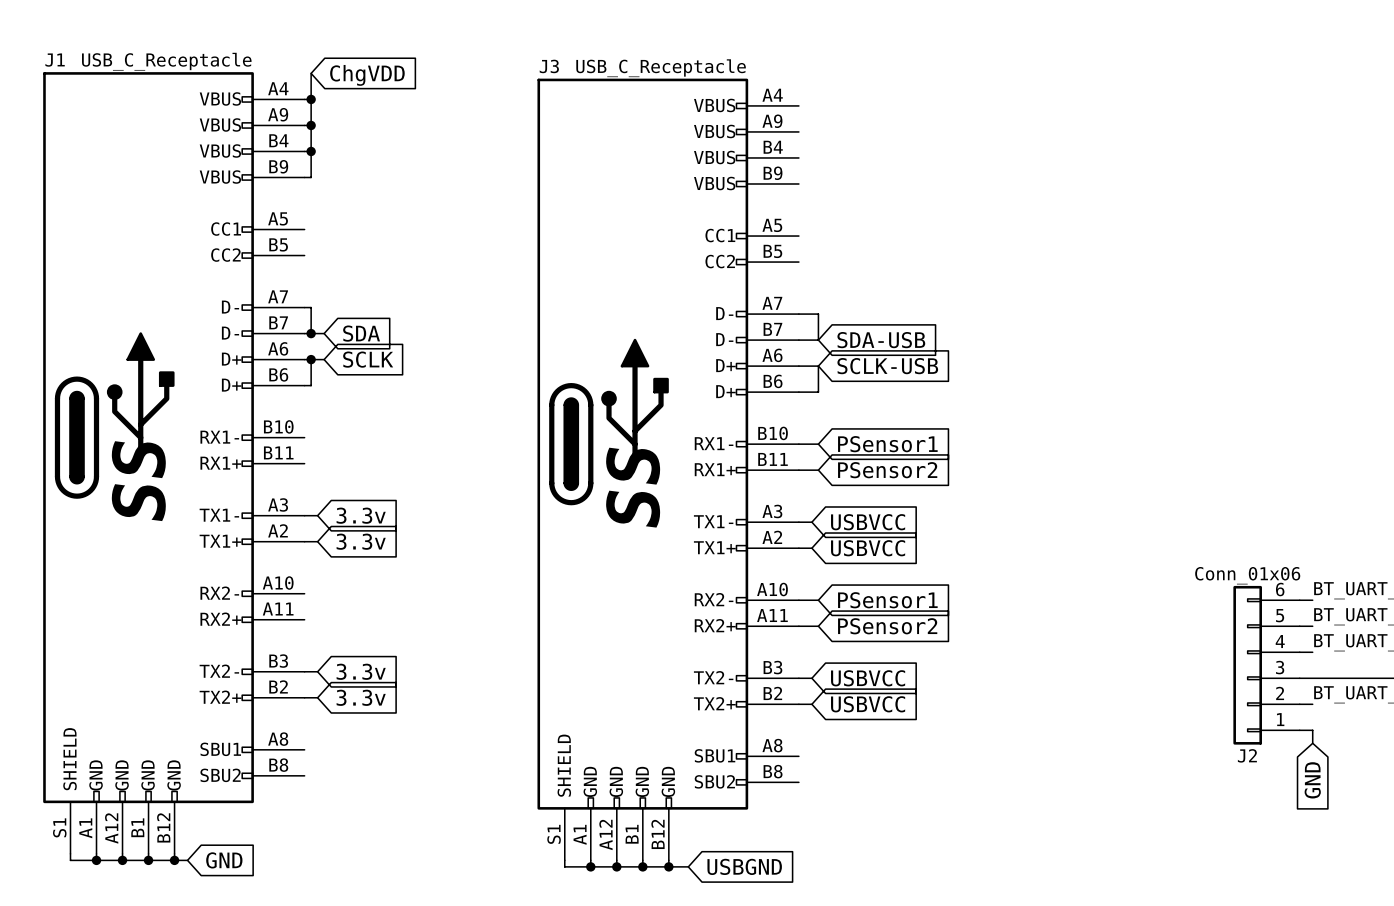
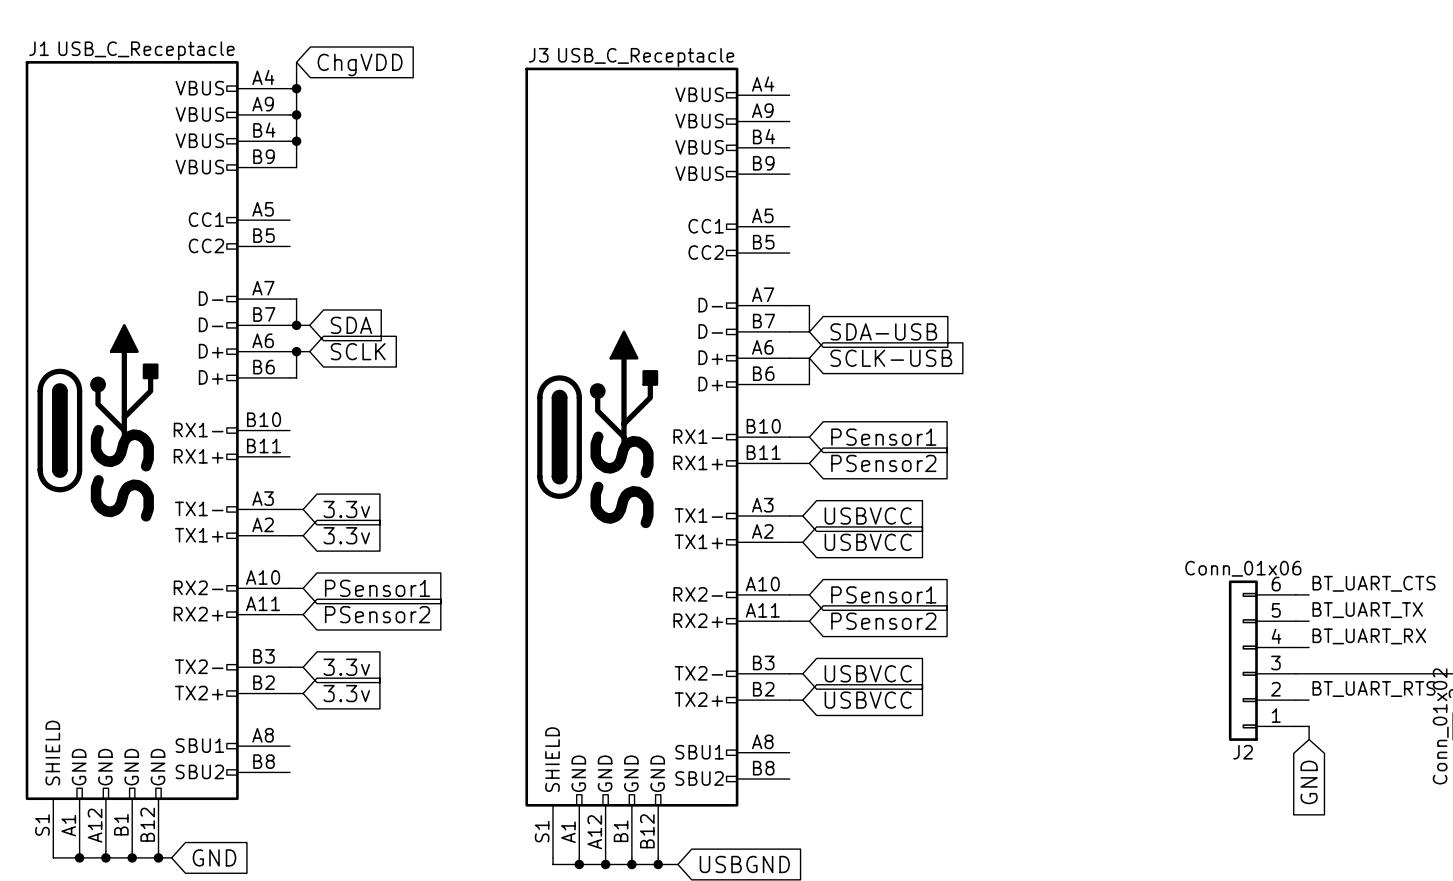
wire: none -> (290, 588) (303, 588)
global label: none -> PSensor1 (377, 588)
wire: none -> (290, 614) (303, 614)
global label: none -> PSensor2 (377, 614)

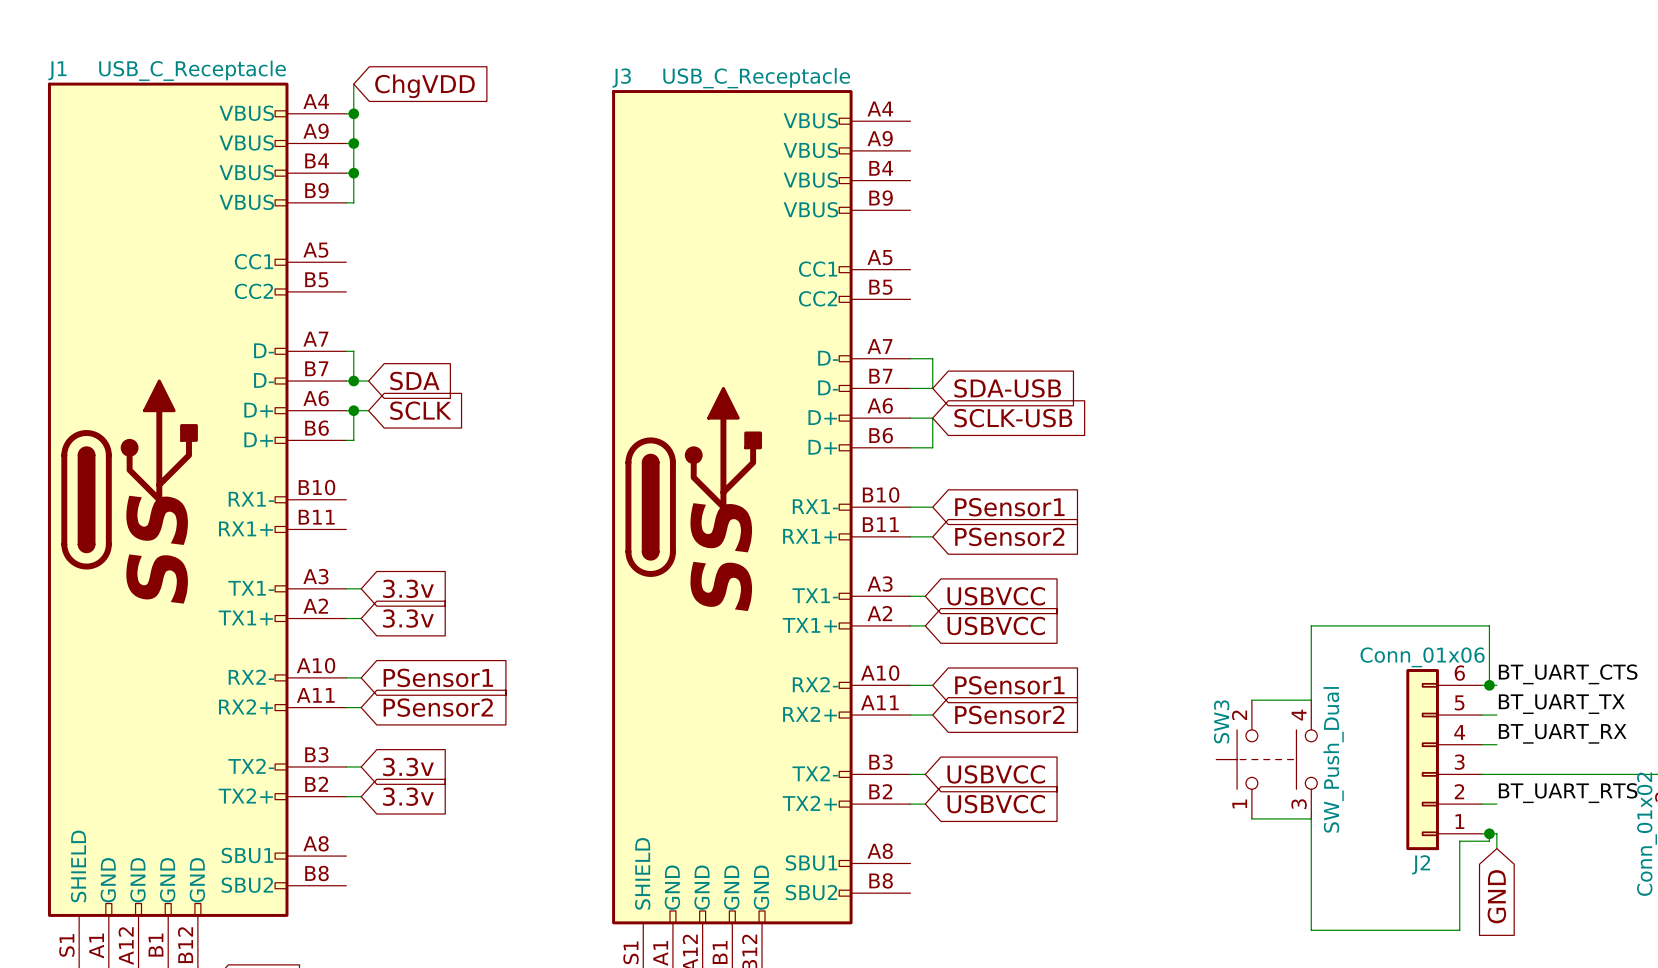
wire: none -> (1489, 685) (1489, 625) (1311, 625) (1311, 700) (1251, 700)
junction: none -> (1489, 685)
SW3: none -> SW_Push_Dual (1266, 759)
wire: none -> (1251, 818) (1311, 818) (1311, 930) (1459, 930) (1459, 841) (1489, 841) (1489, 833)
junction: none -> (1489, 833)

